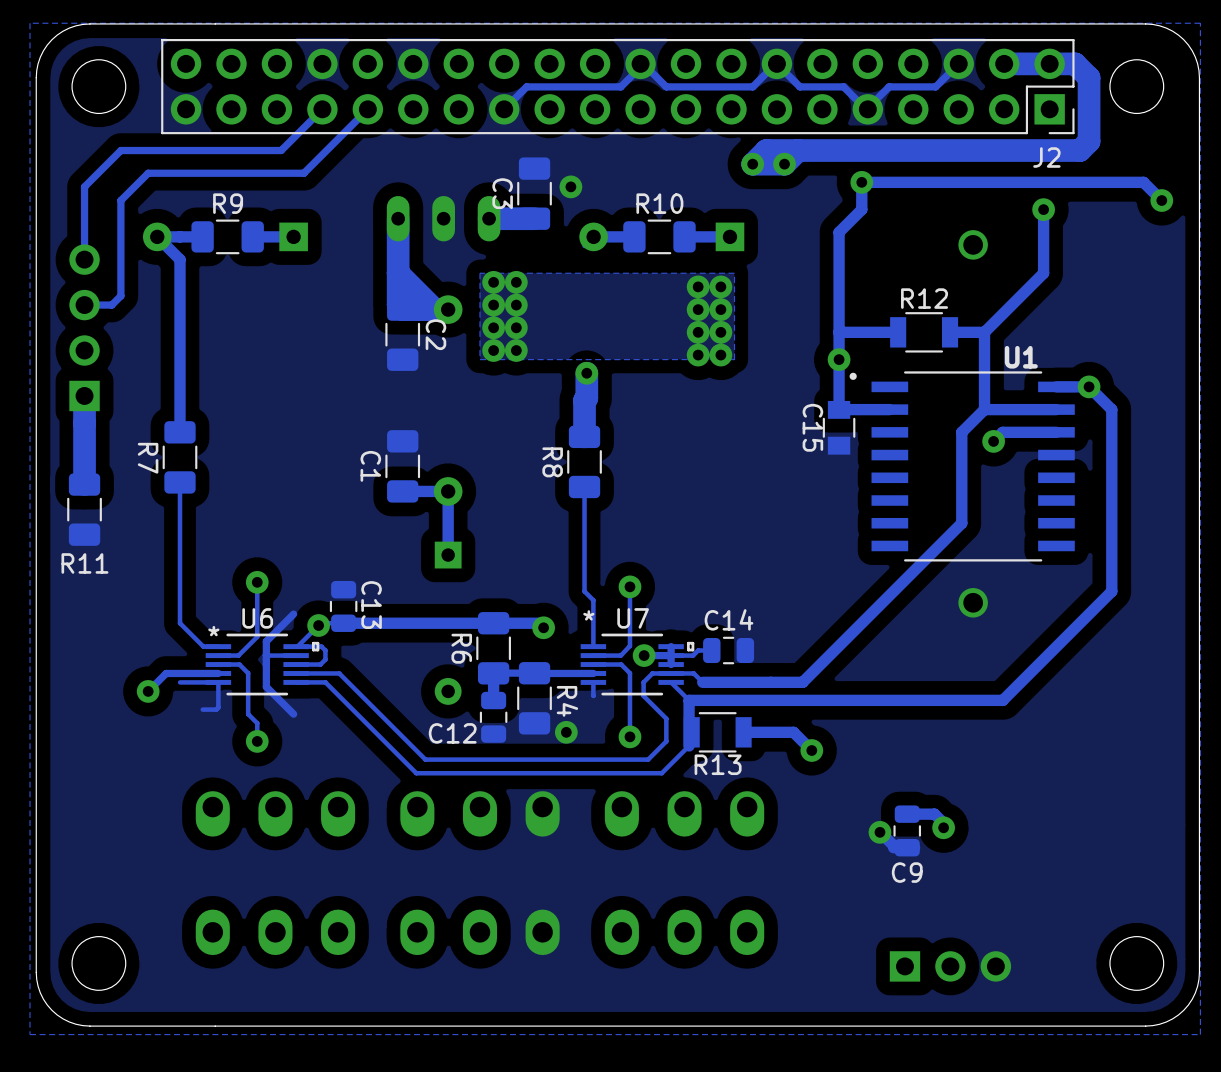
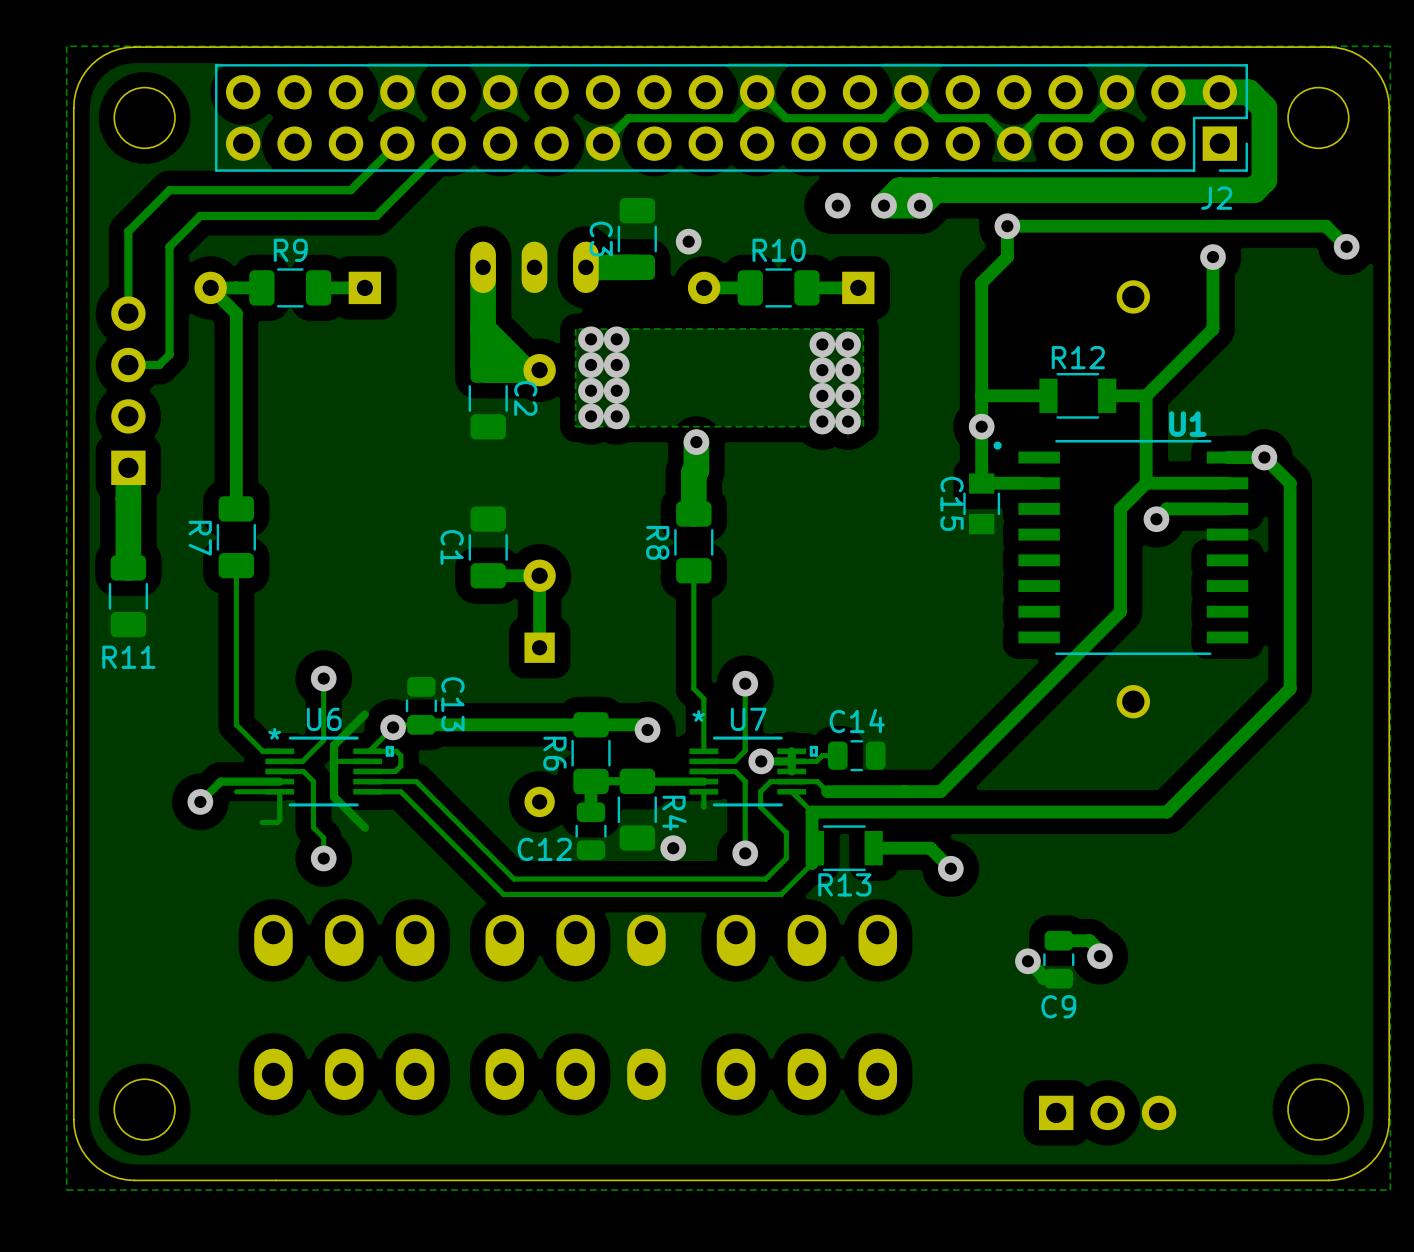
via: none -> (837, 205)
via position: (570, 186) -> (688, 241)

